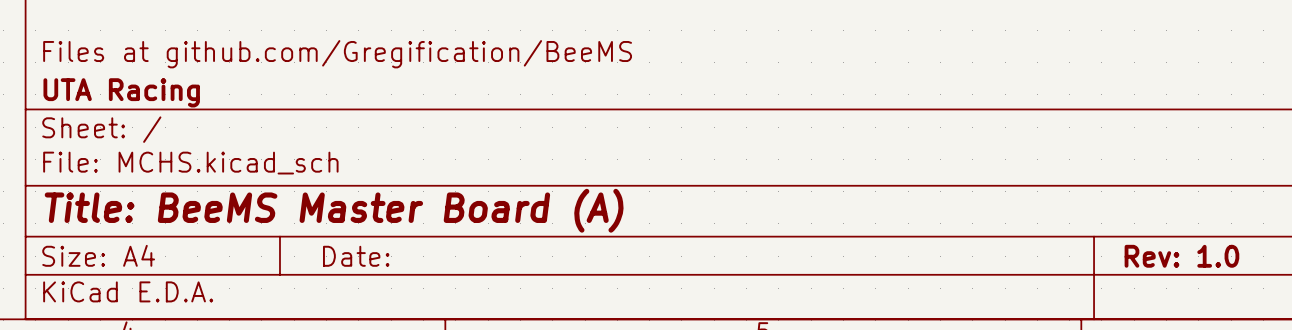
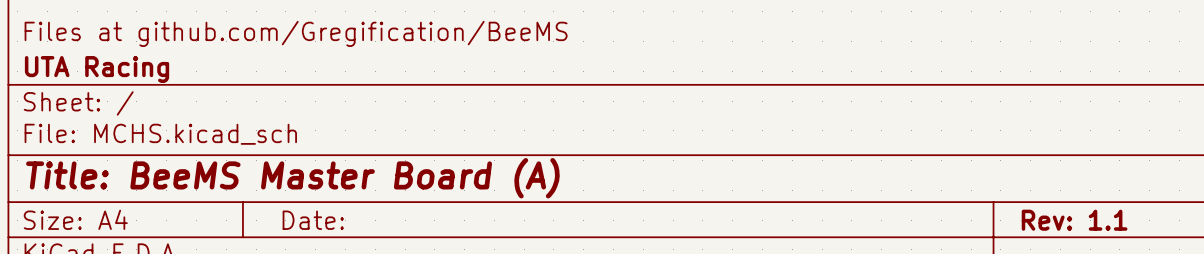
title block: Rev: 1.0 (1181, 256) -> Rev: 1.1 (1074, 220)

